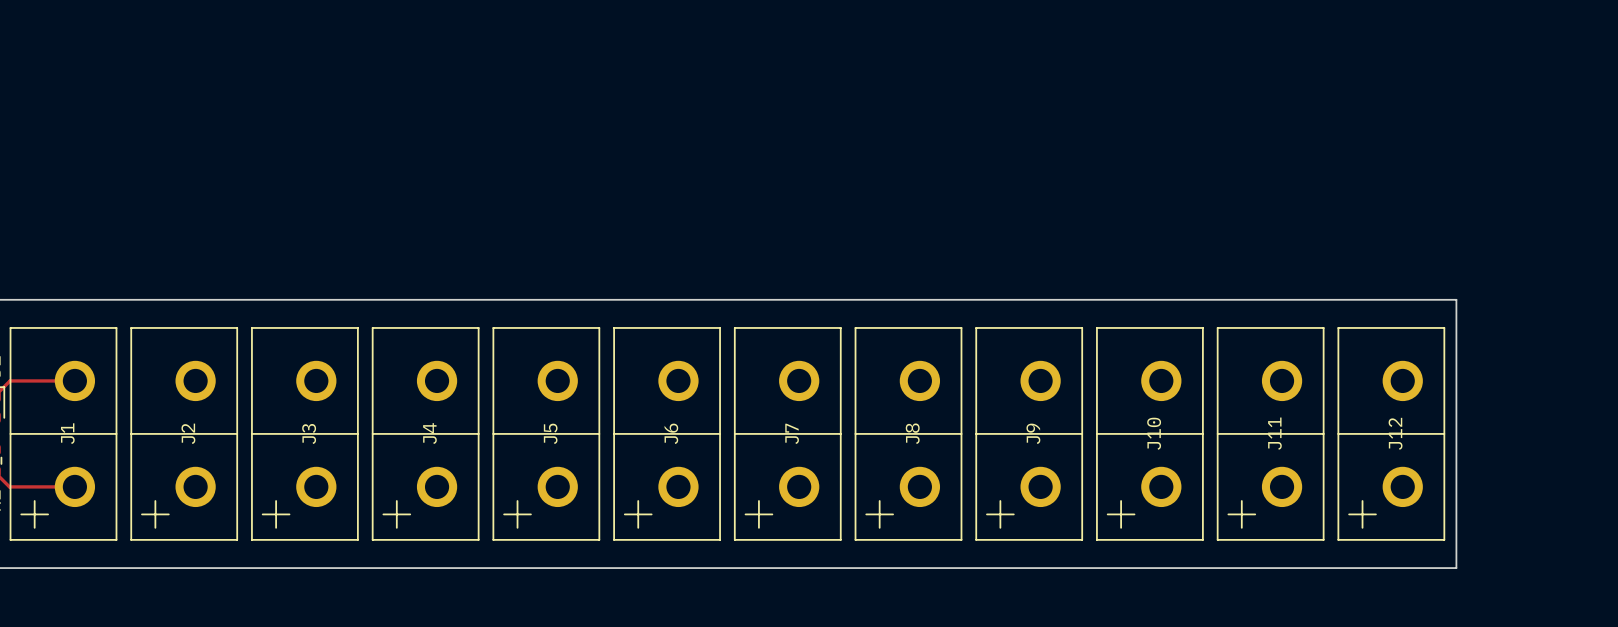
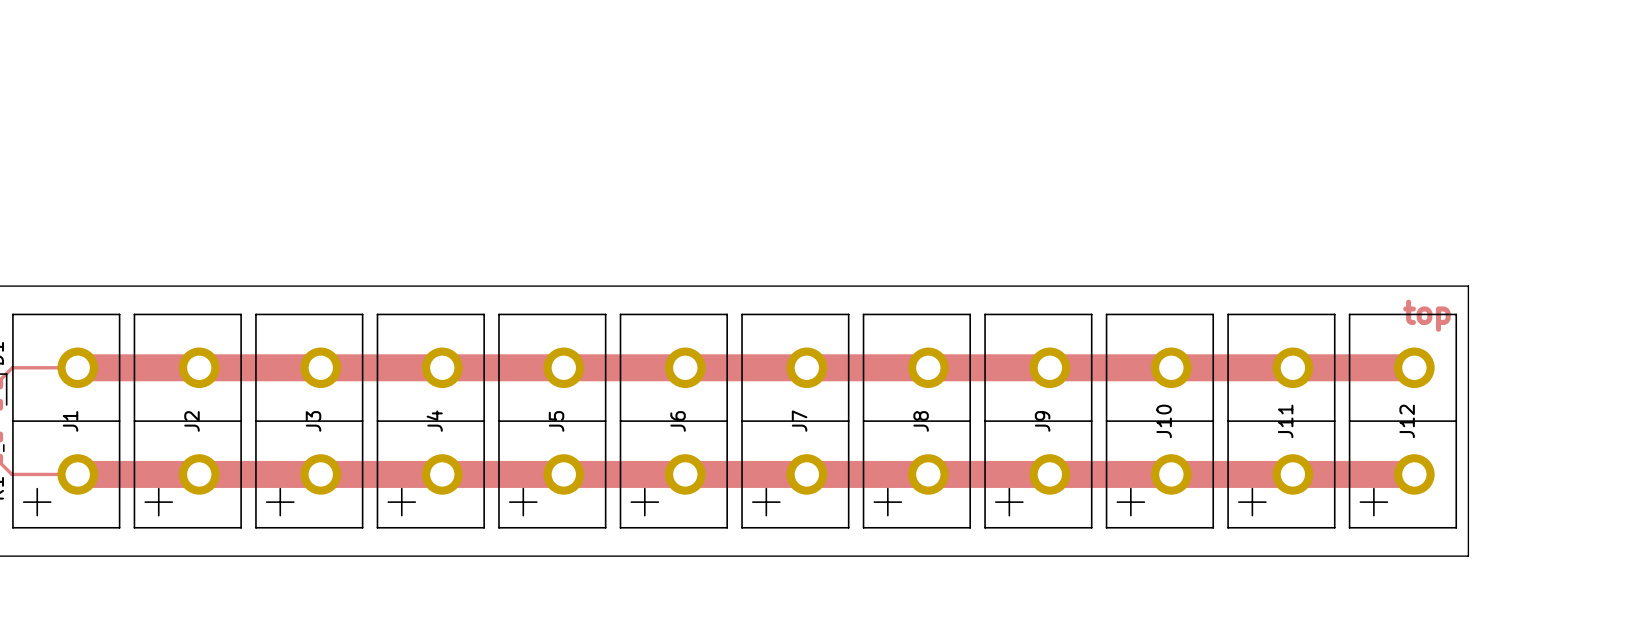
text: none -> top (1426, 315)
track: none -> (77, 367) (1414, 367)
track: none -> (77, 474) (1414, 474)

